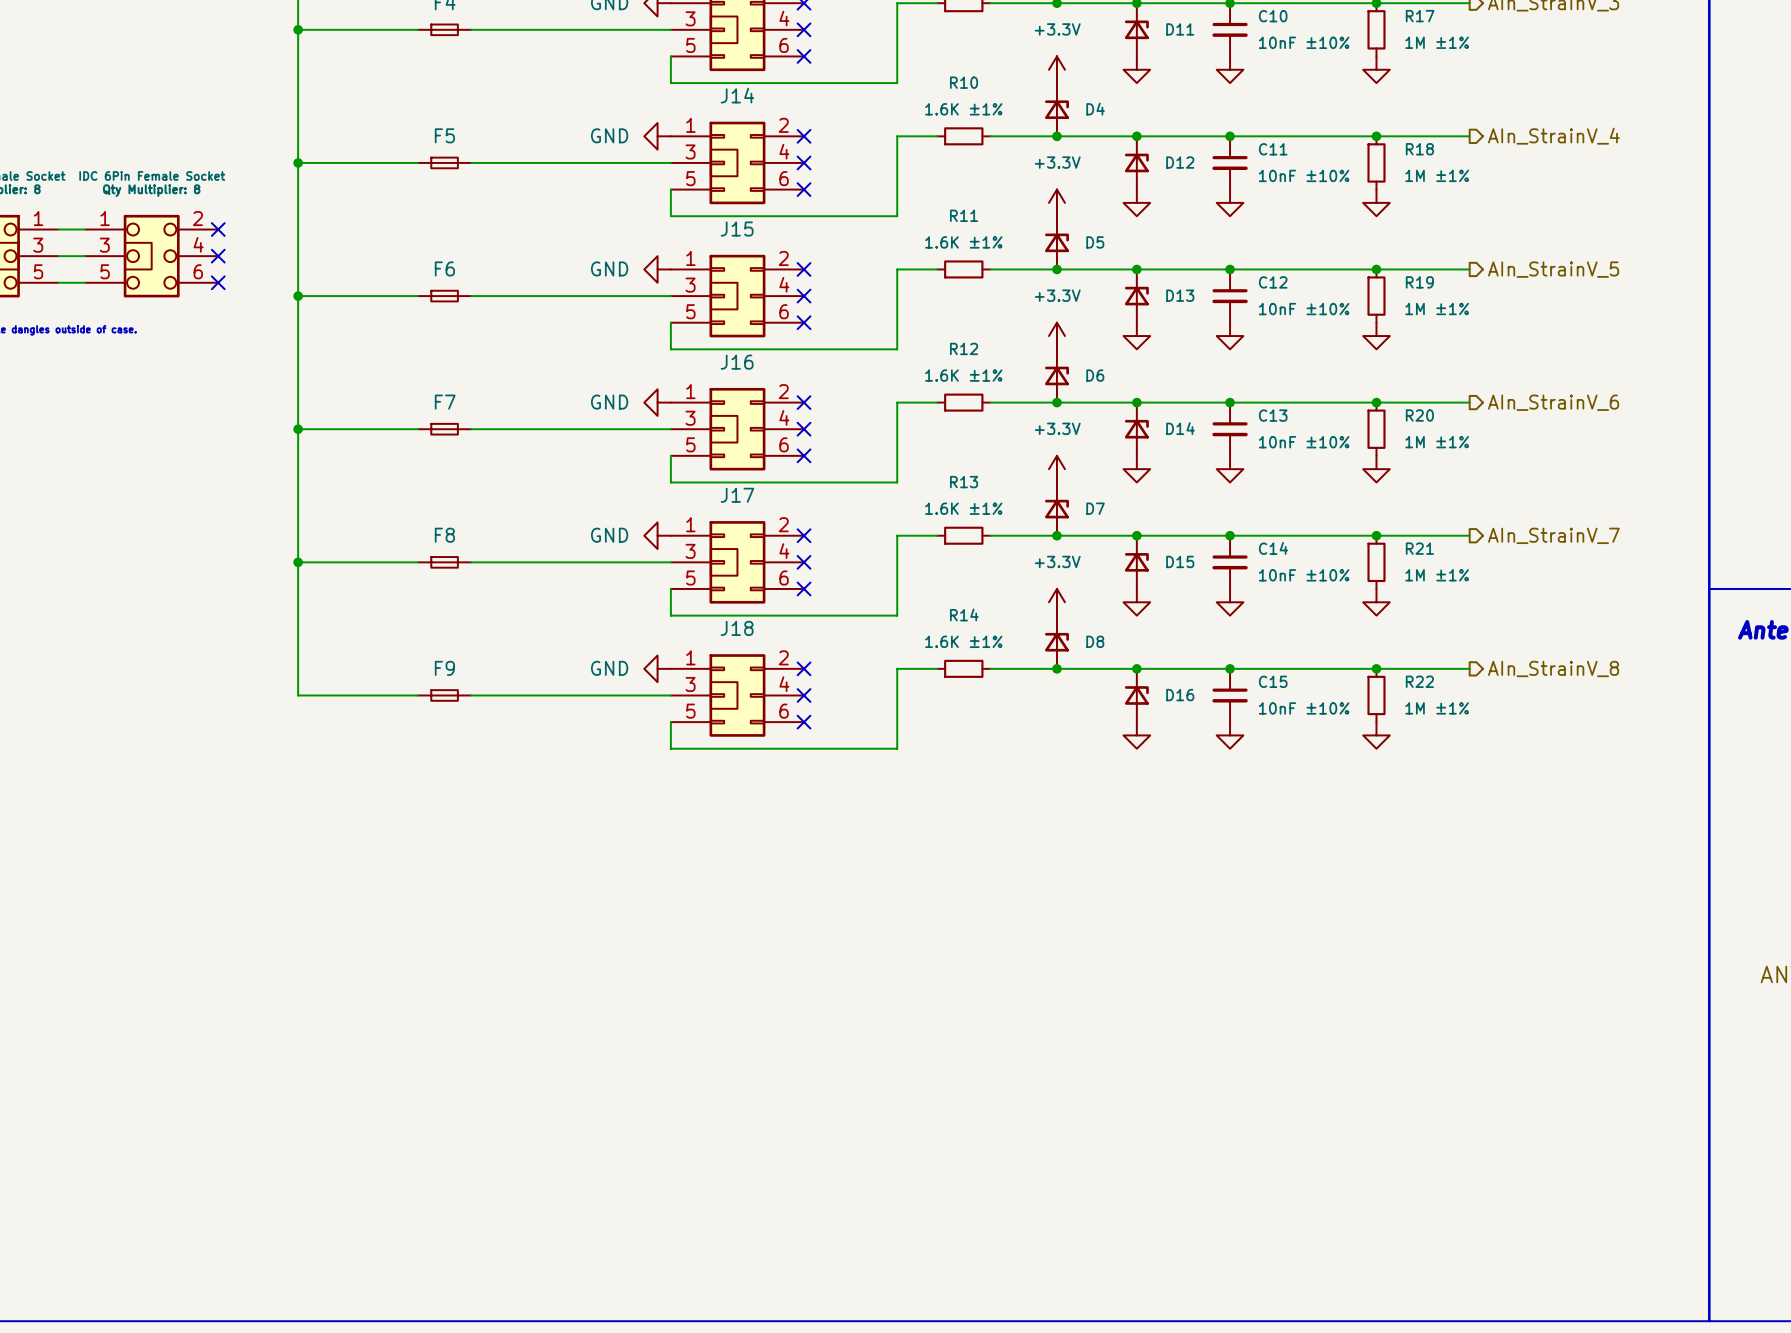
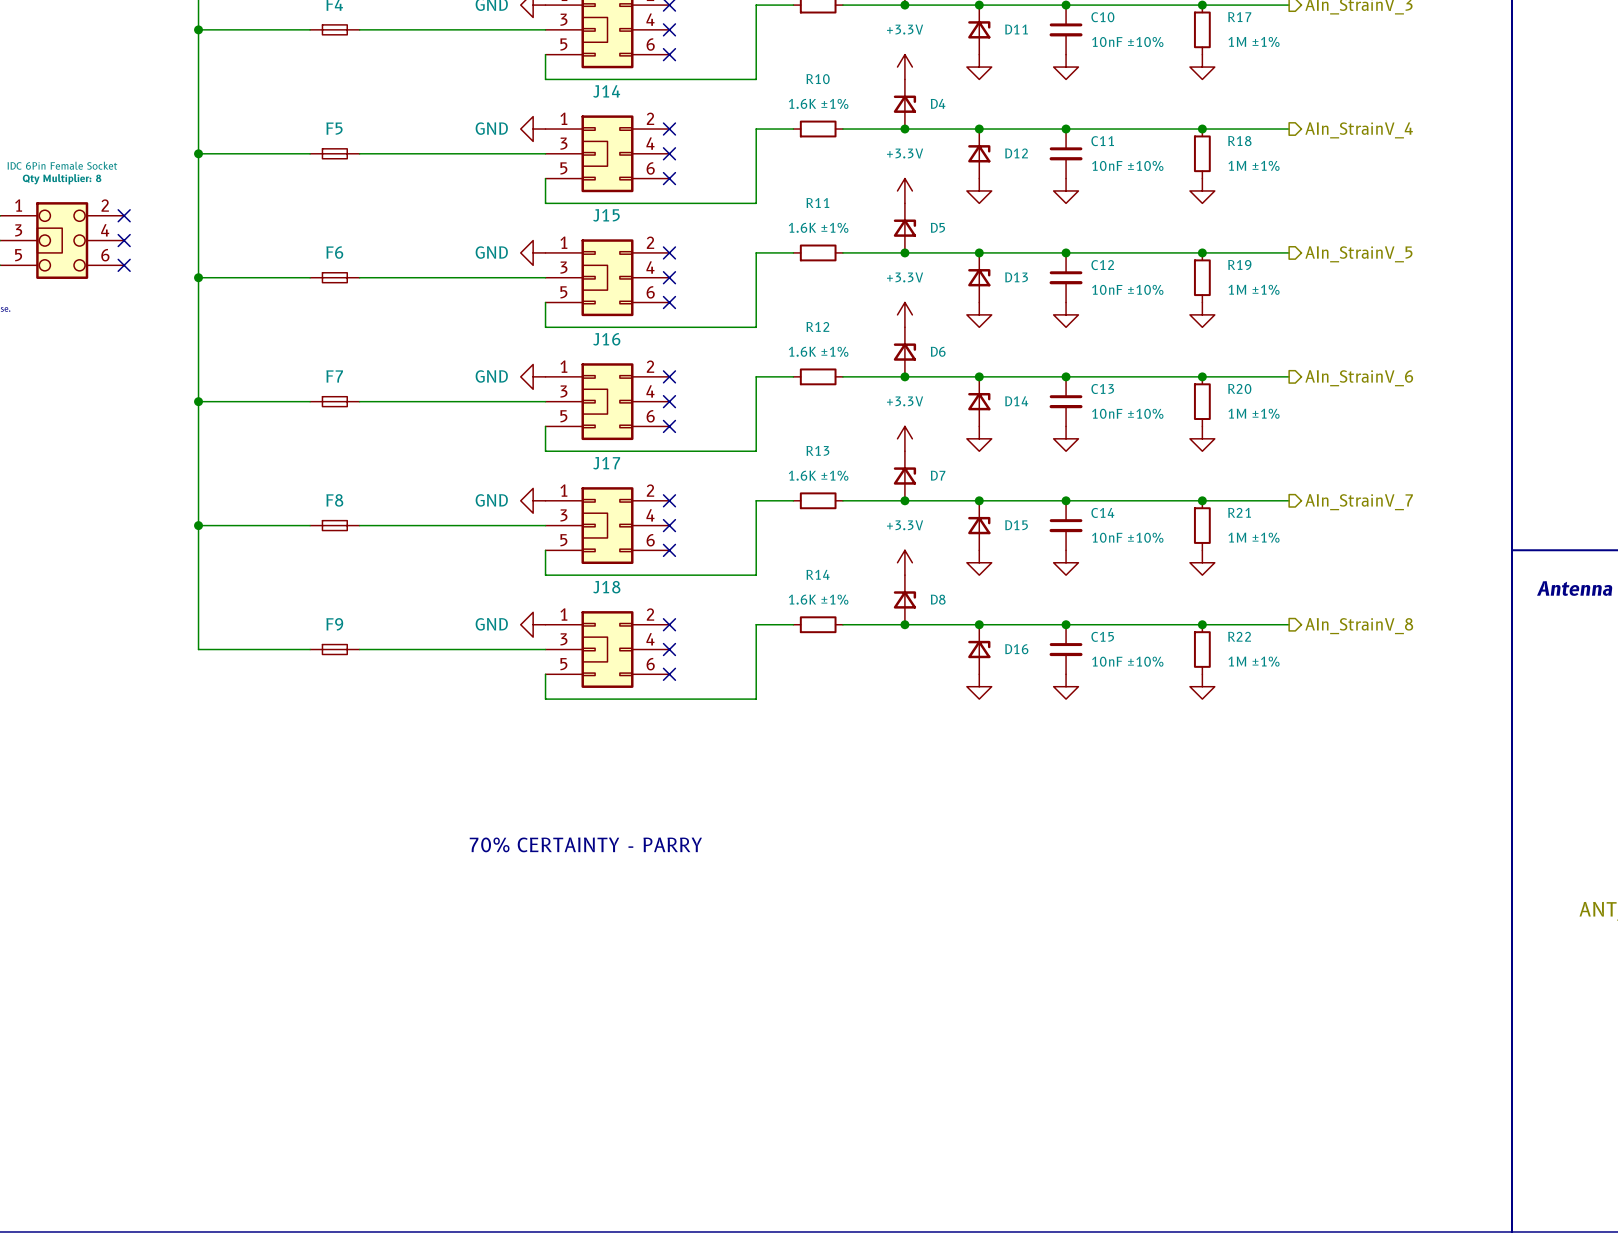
text: none -> 70% CERTAINTY - PARRY (585, 844)

